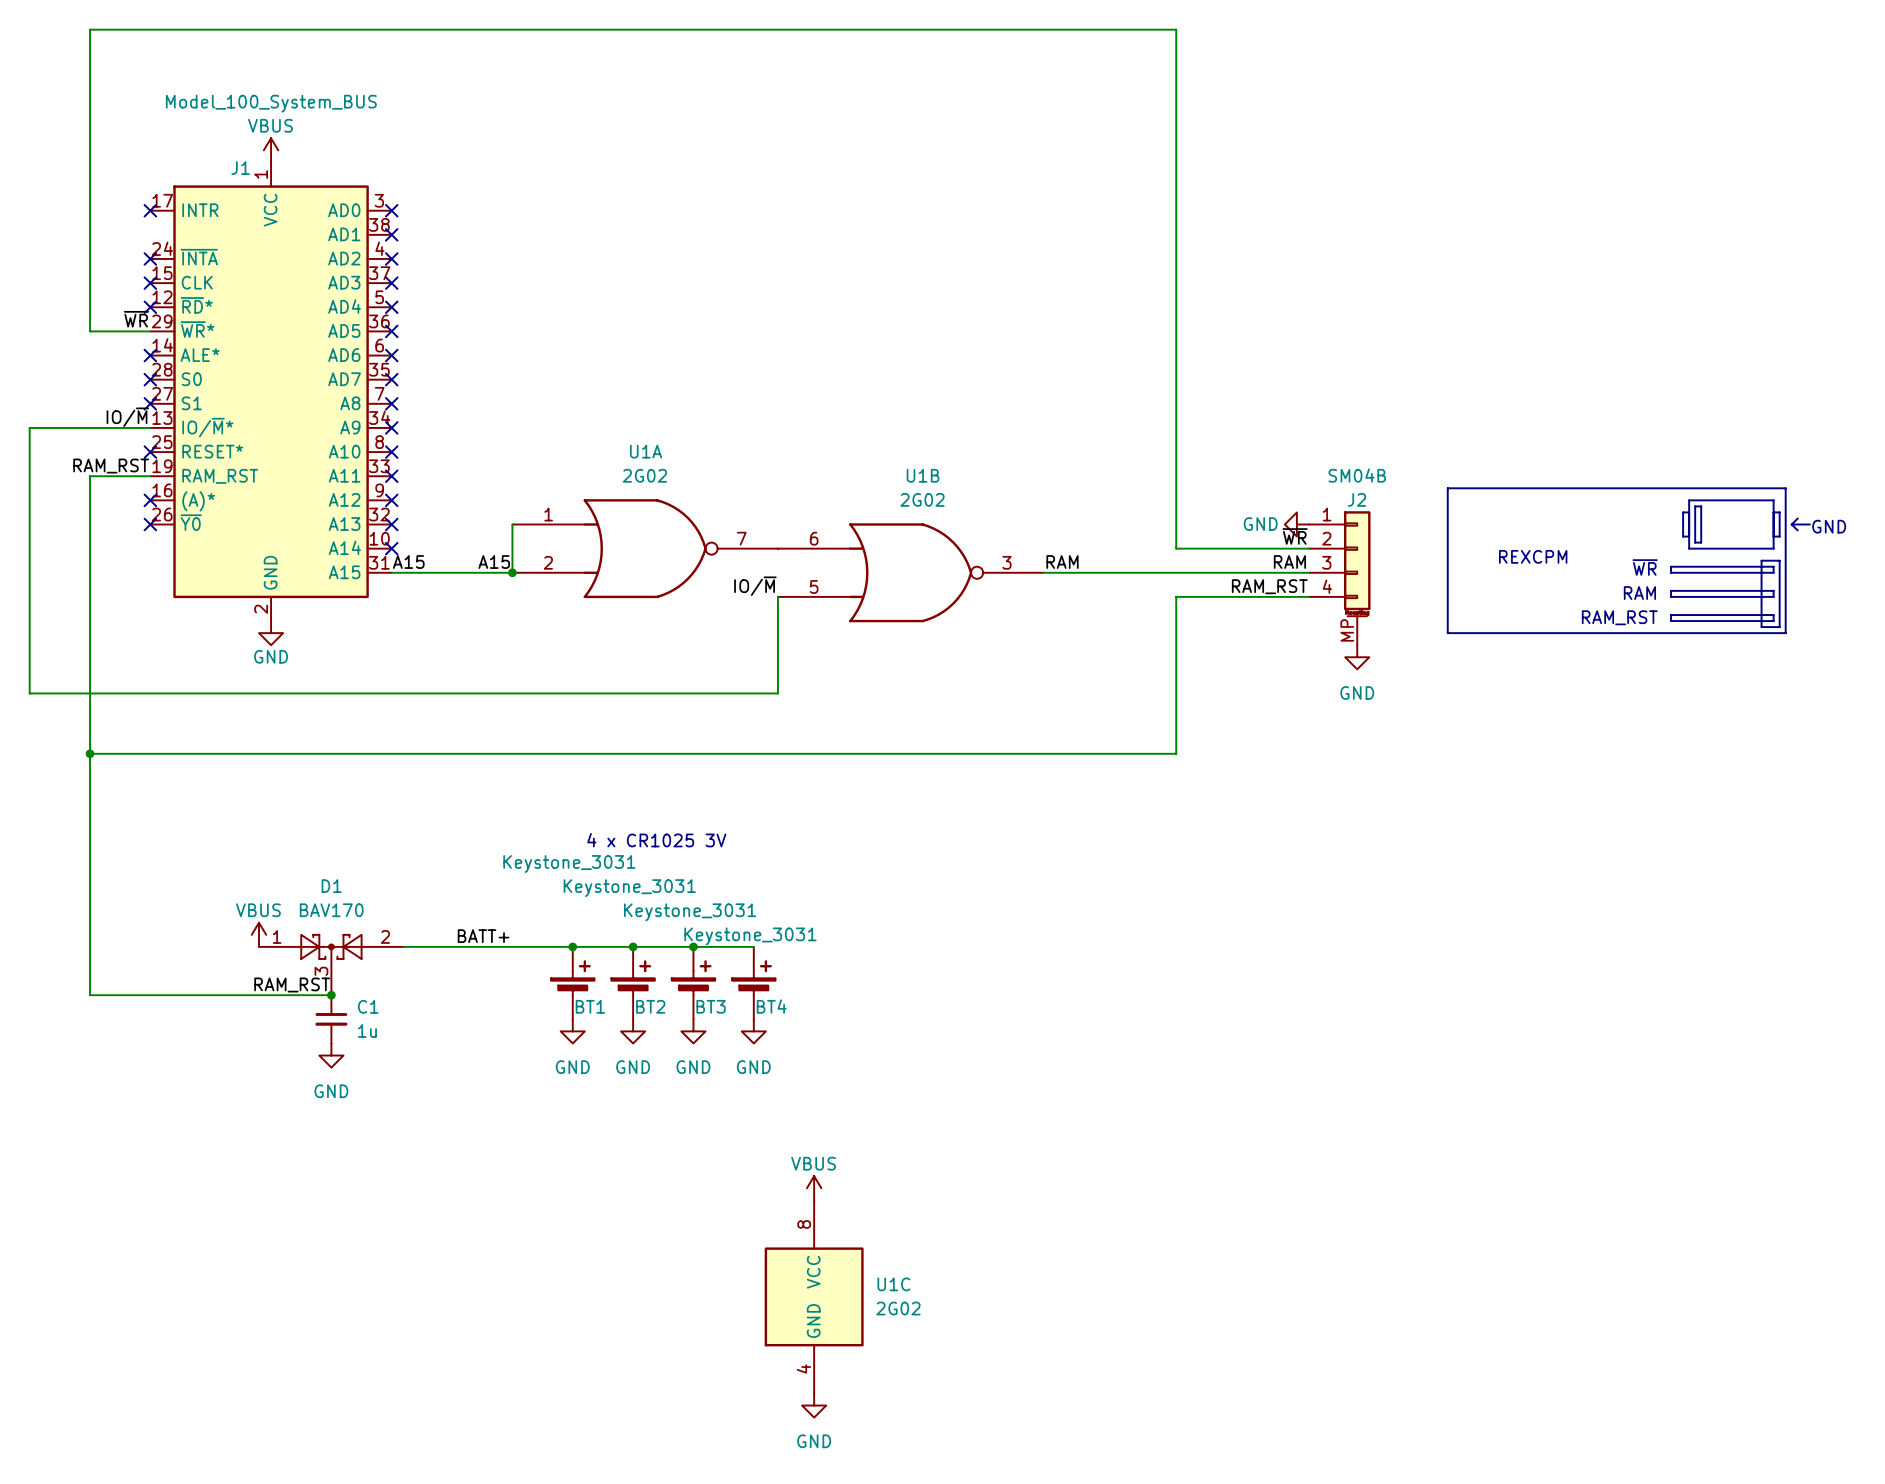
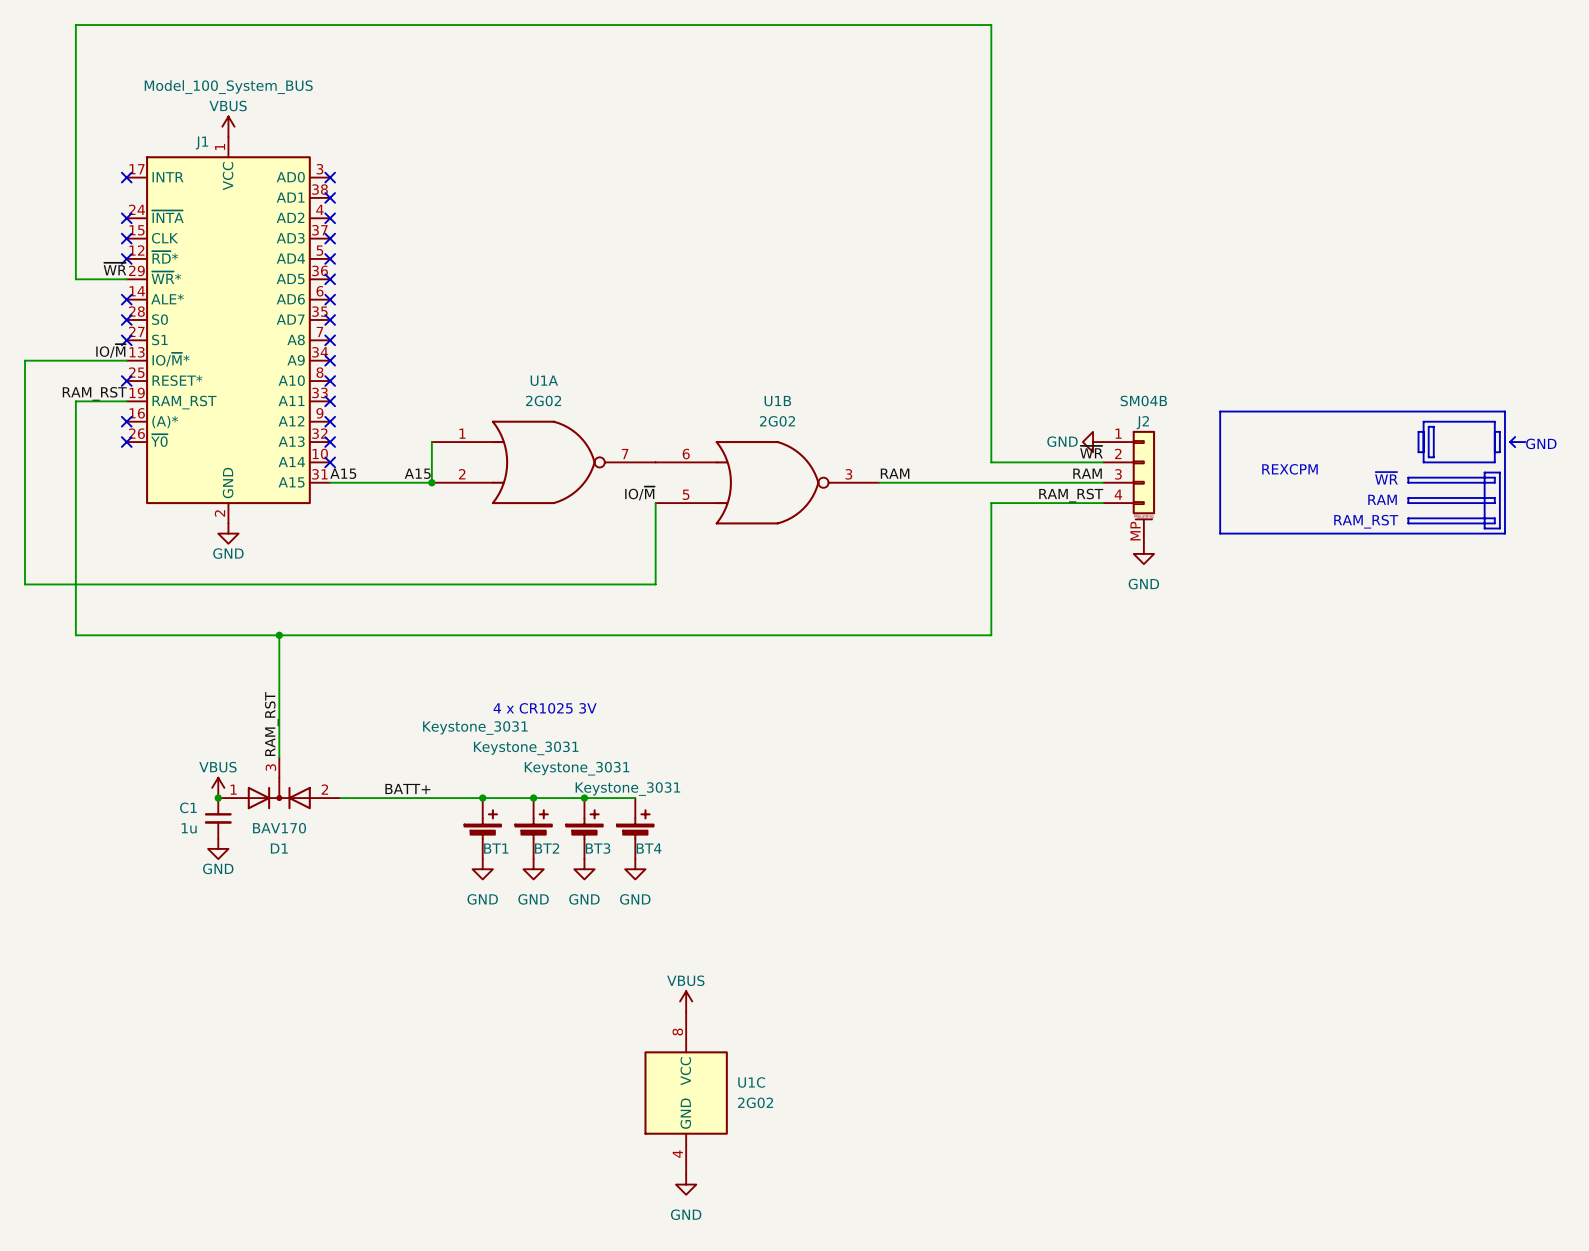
wire: (90, 753) (90, 995) (331, 995) -> none
junction: (90, 753) -> none
wire: none -> (279, 635) (279, 757)
junction: none -> (279, 635)
D1 name position: D1 (331, 886) -> D1 (279, 848)
D1 value position: BAV170 (331, 910) -> BAV170 (279, 828)
D1 symbol: [258, 934, 404, 996] -> [218, 757, 341, 810]
junction: none -> (218, 798)
label rotation: 0° (292, 984) -> 90° counterclockwise (271, 724)
label position: RAM_RST (292, 984) -> RAM_RST (271, 724)
junction: (331, 995) -> none
C1 name position: C1 (368, 1006) -> C1 (188, 807)
C1 position: (331, 1019) -> (218, 818)
C1 value position: 1u (367, 1031) -> 1u (189, 828)
power symbol position: GND (331, 1055) -> GND (218, 848)
power symbol text position: GND (331, 1091) -> GND (218, 868)

